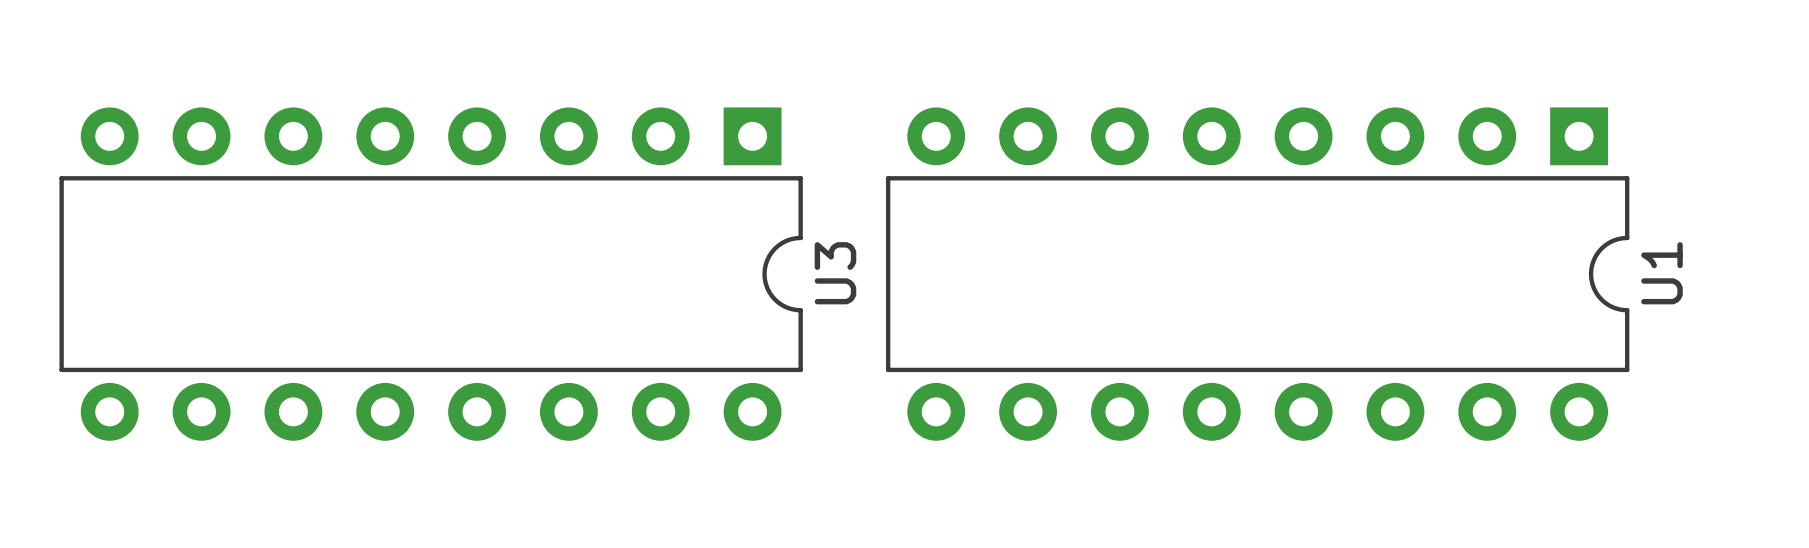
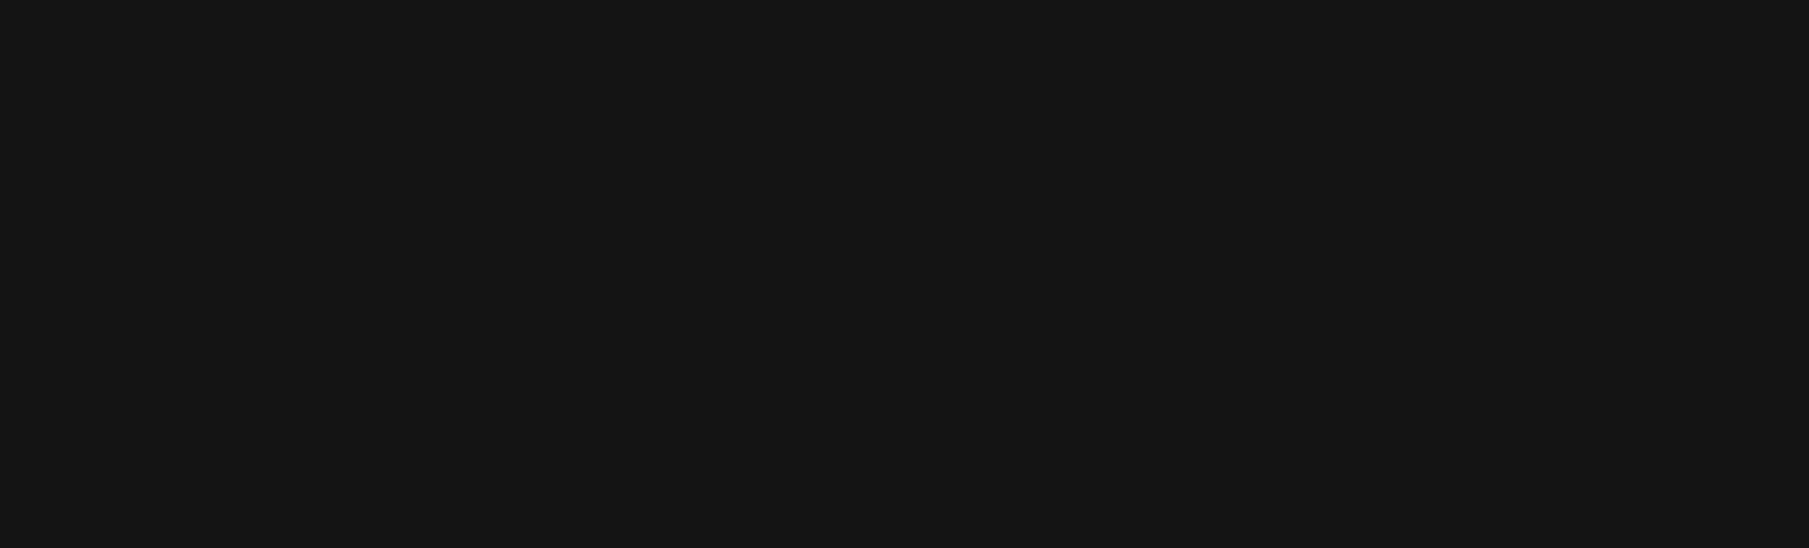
U3: (431, 274) -> none
U1: (1257, 274) -> none

